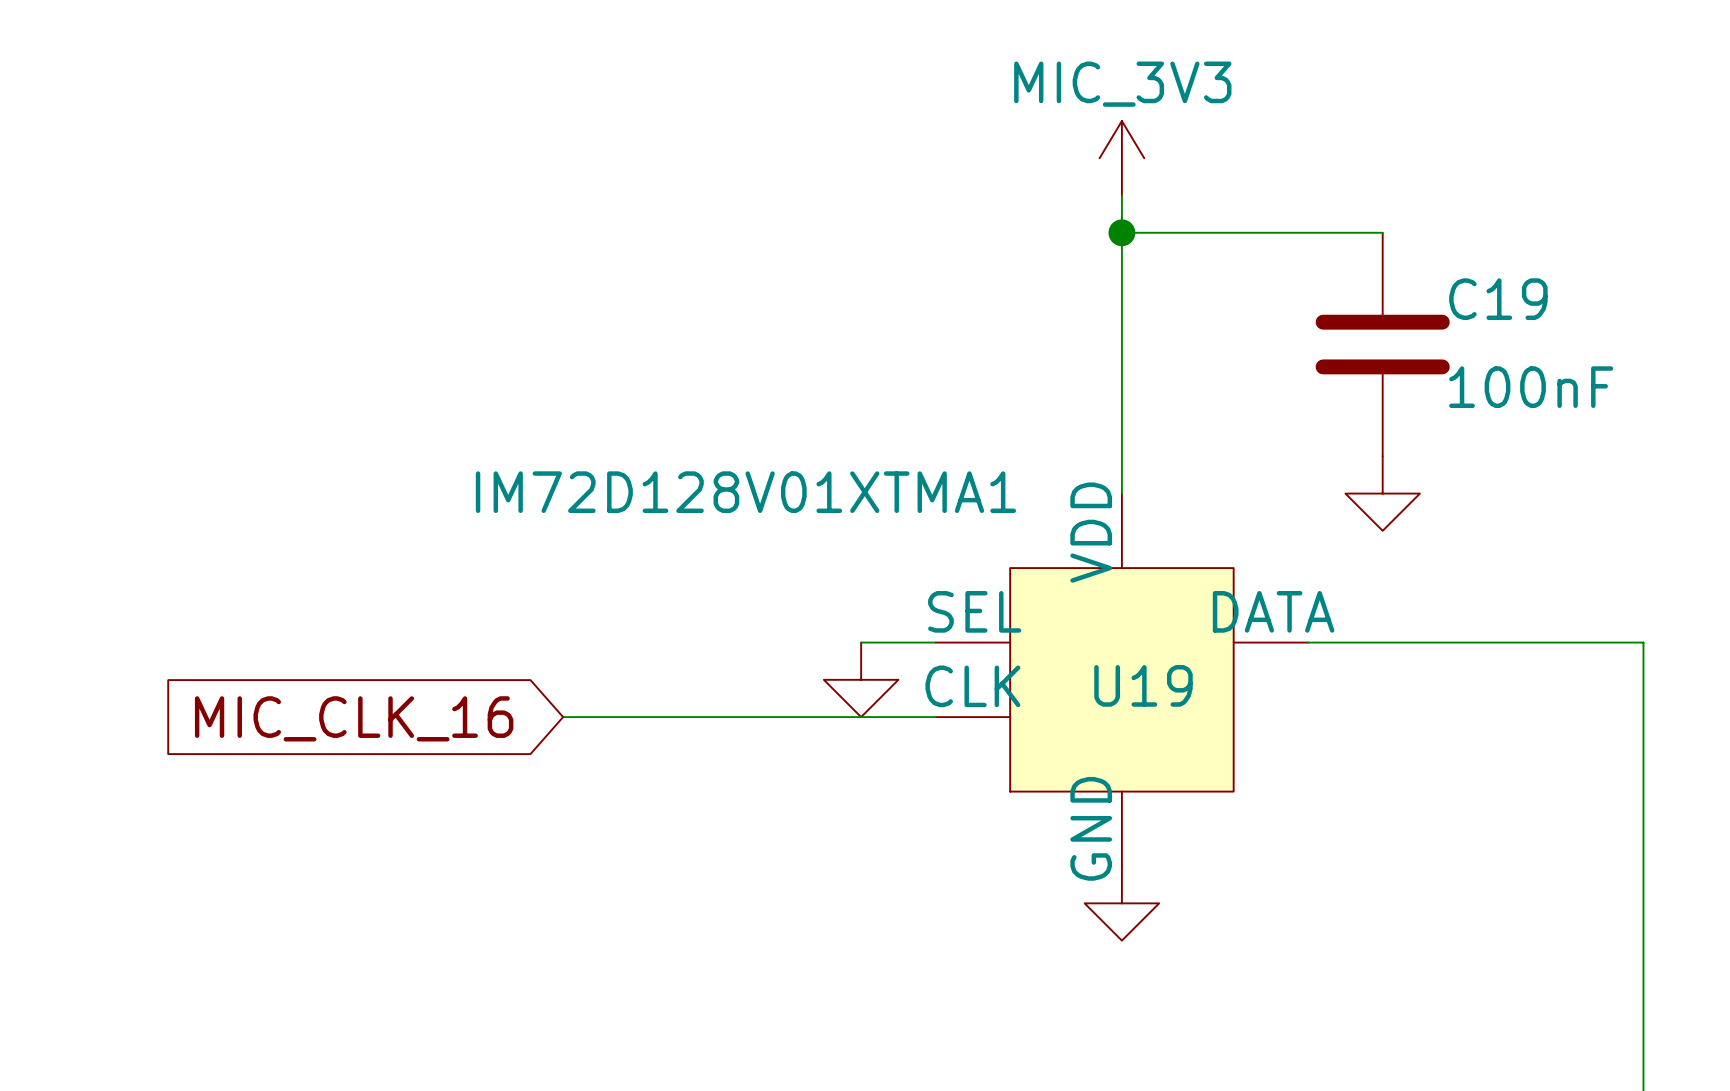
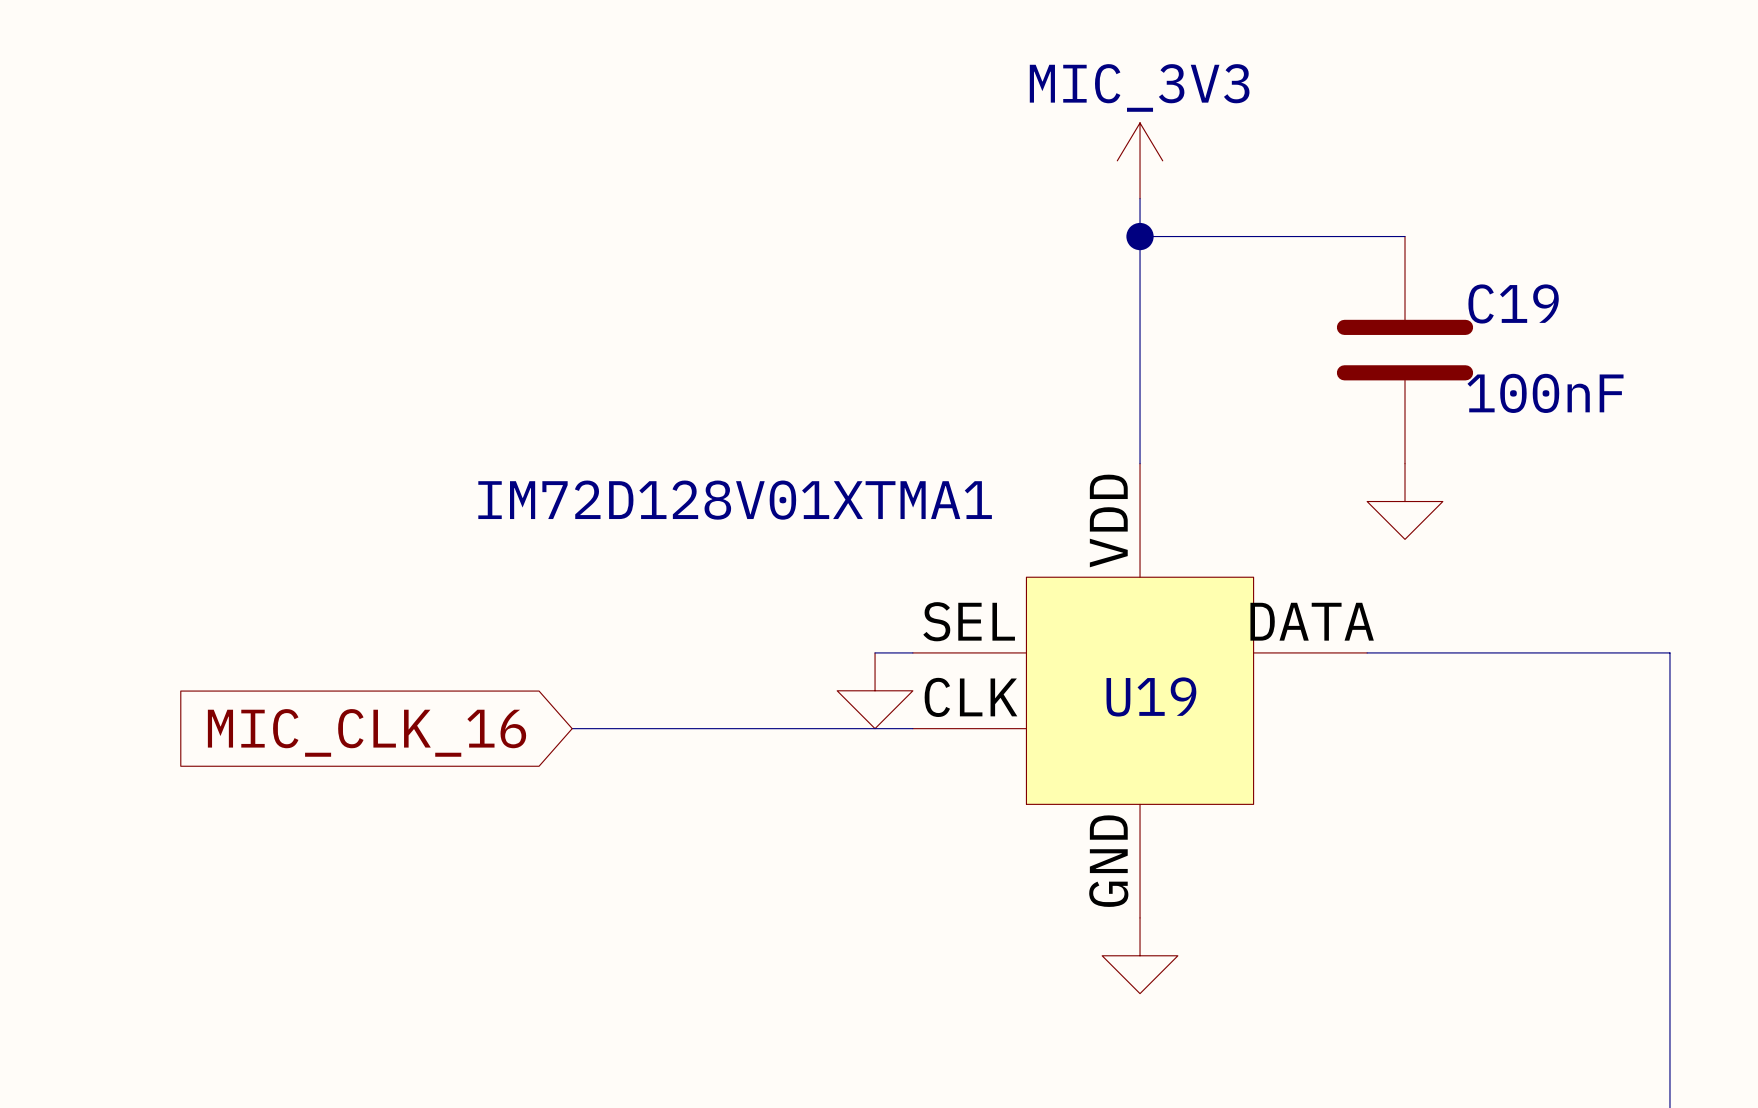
U19 symbol: [935, 493, 1309, 867] -> [912, 463, 1368, 918]
power symbol position: (1121, 903) -> (1140, 955)

